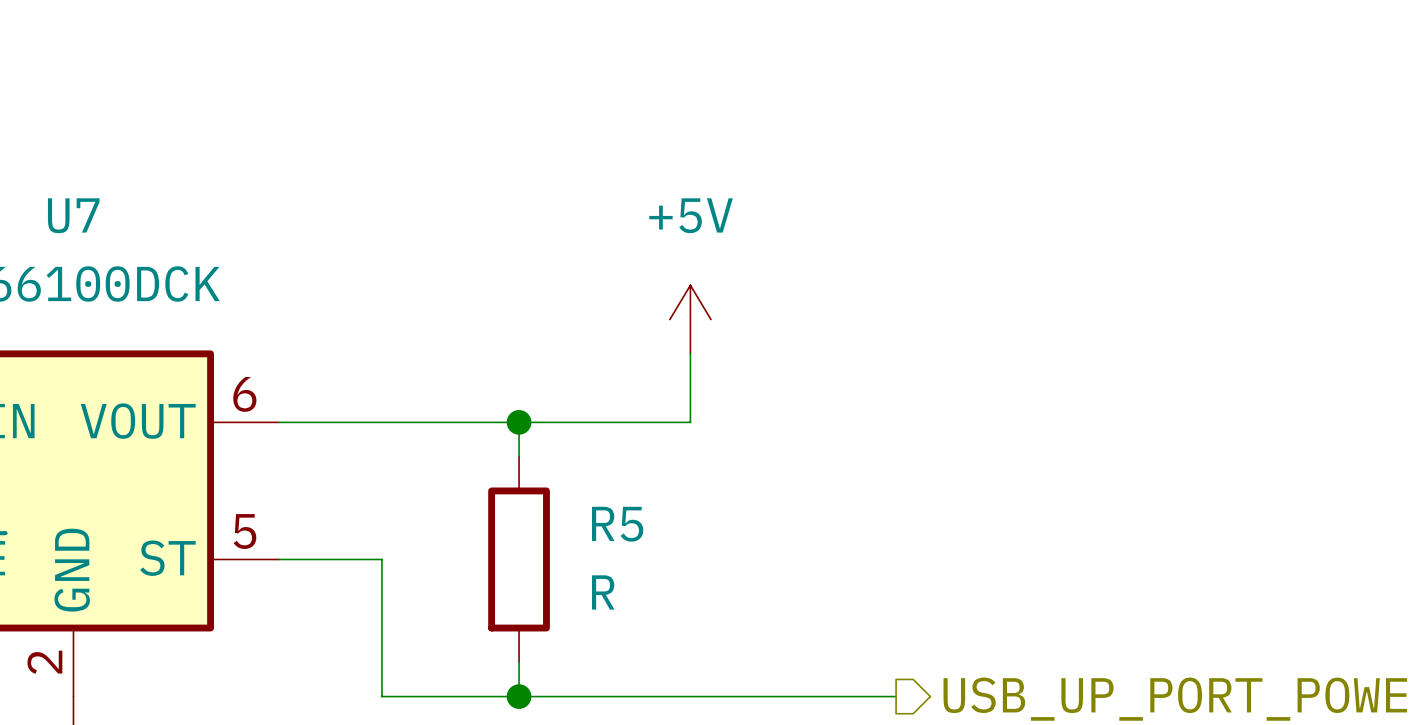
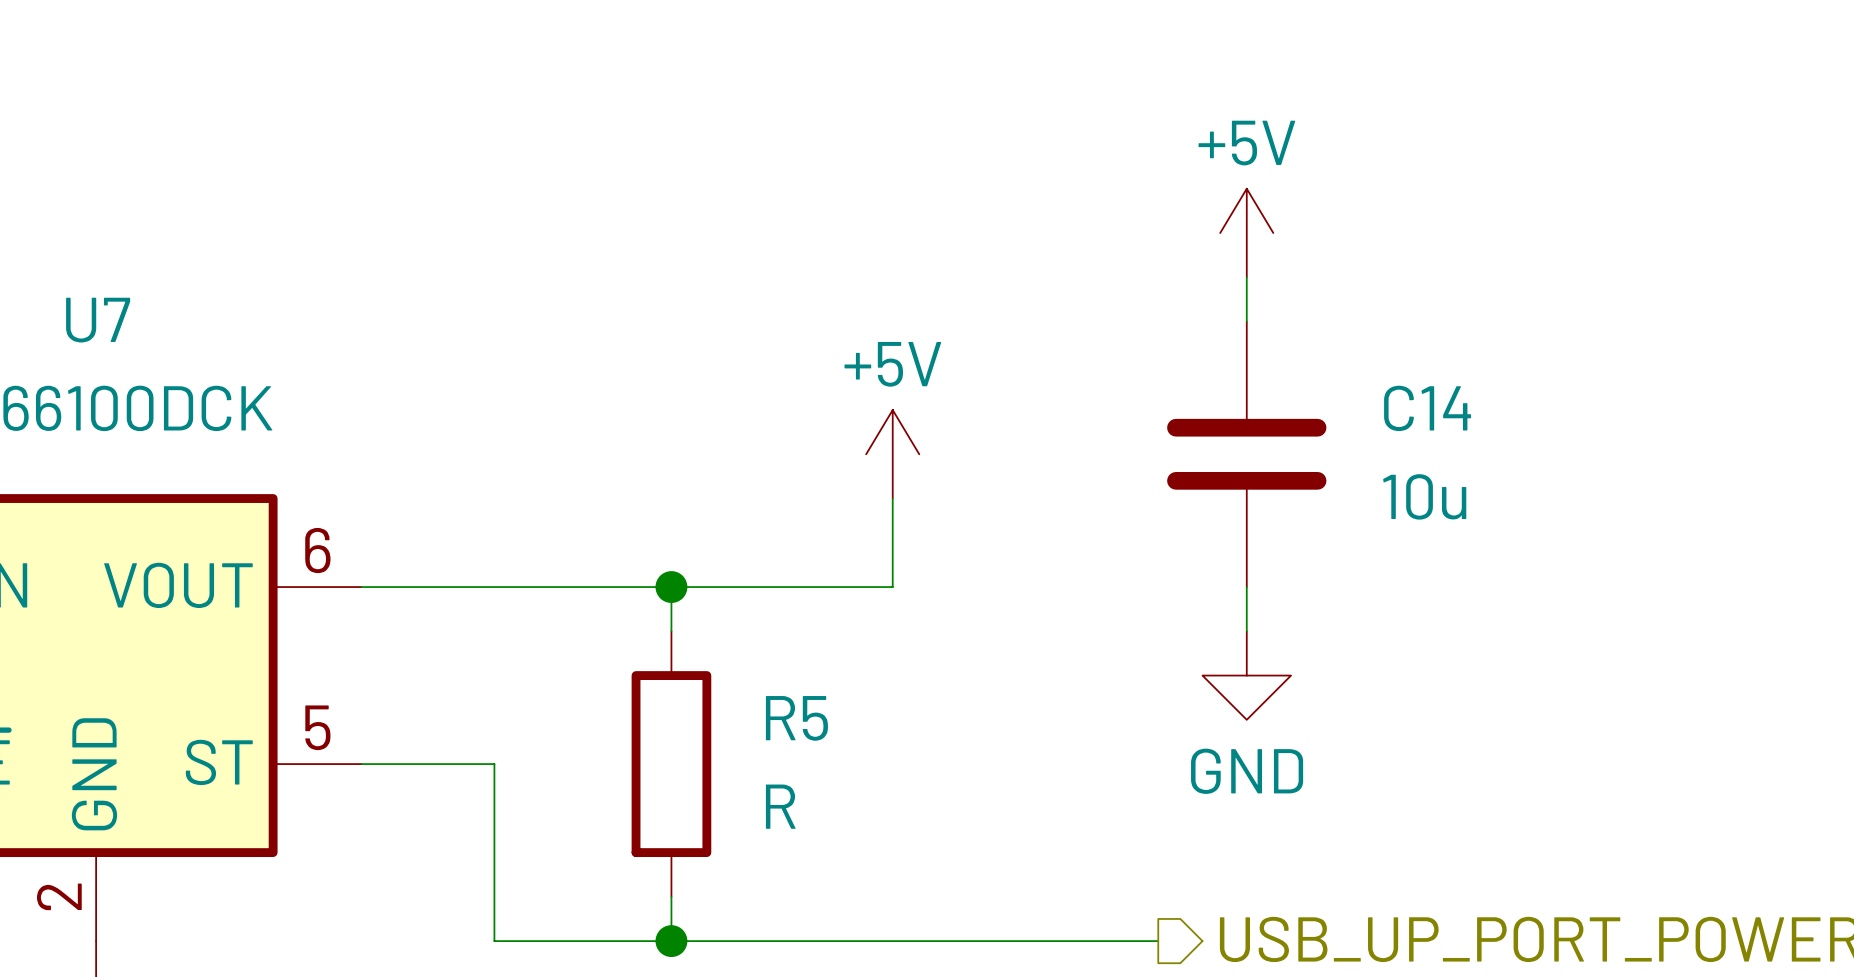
power symbol: none -> +5V (1246, 232)
wire: none -> (1246, 277) (1246, 321)
power symbol text position: +5V (691, 215) -> +5V (892, 364)
C14: none -> 10u (1246, 454)
wire: none -> (1246, 587) (1246, 631)
power symbol: none -> GND (1246, 675)

